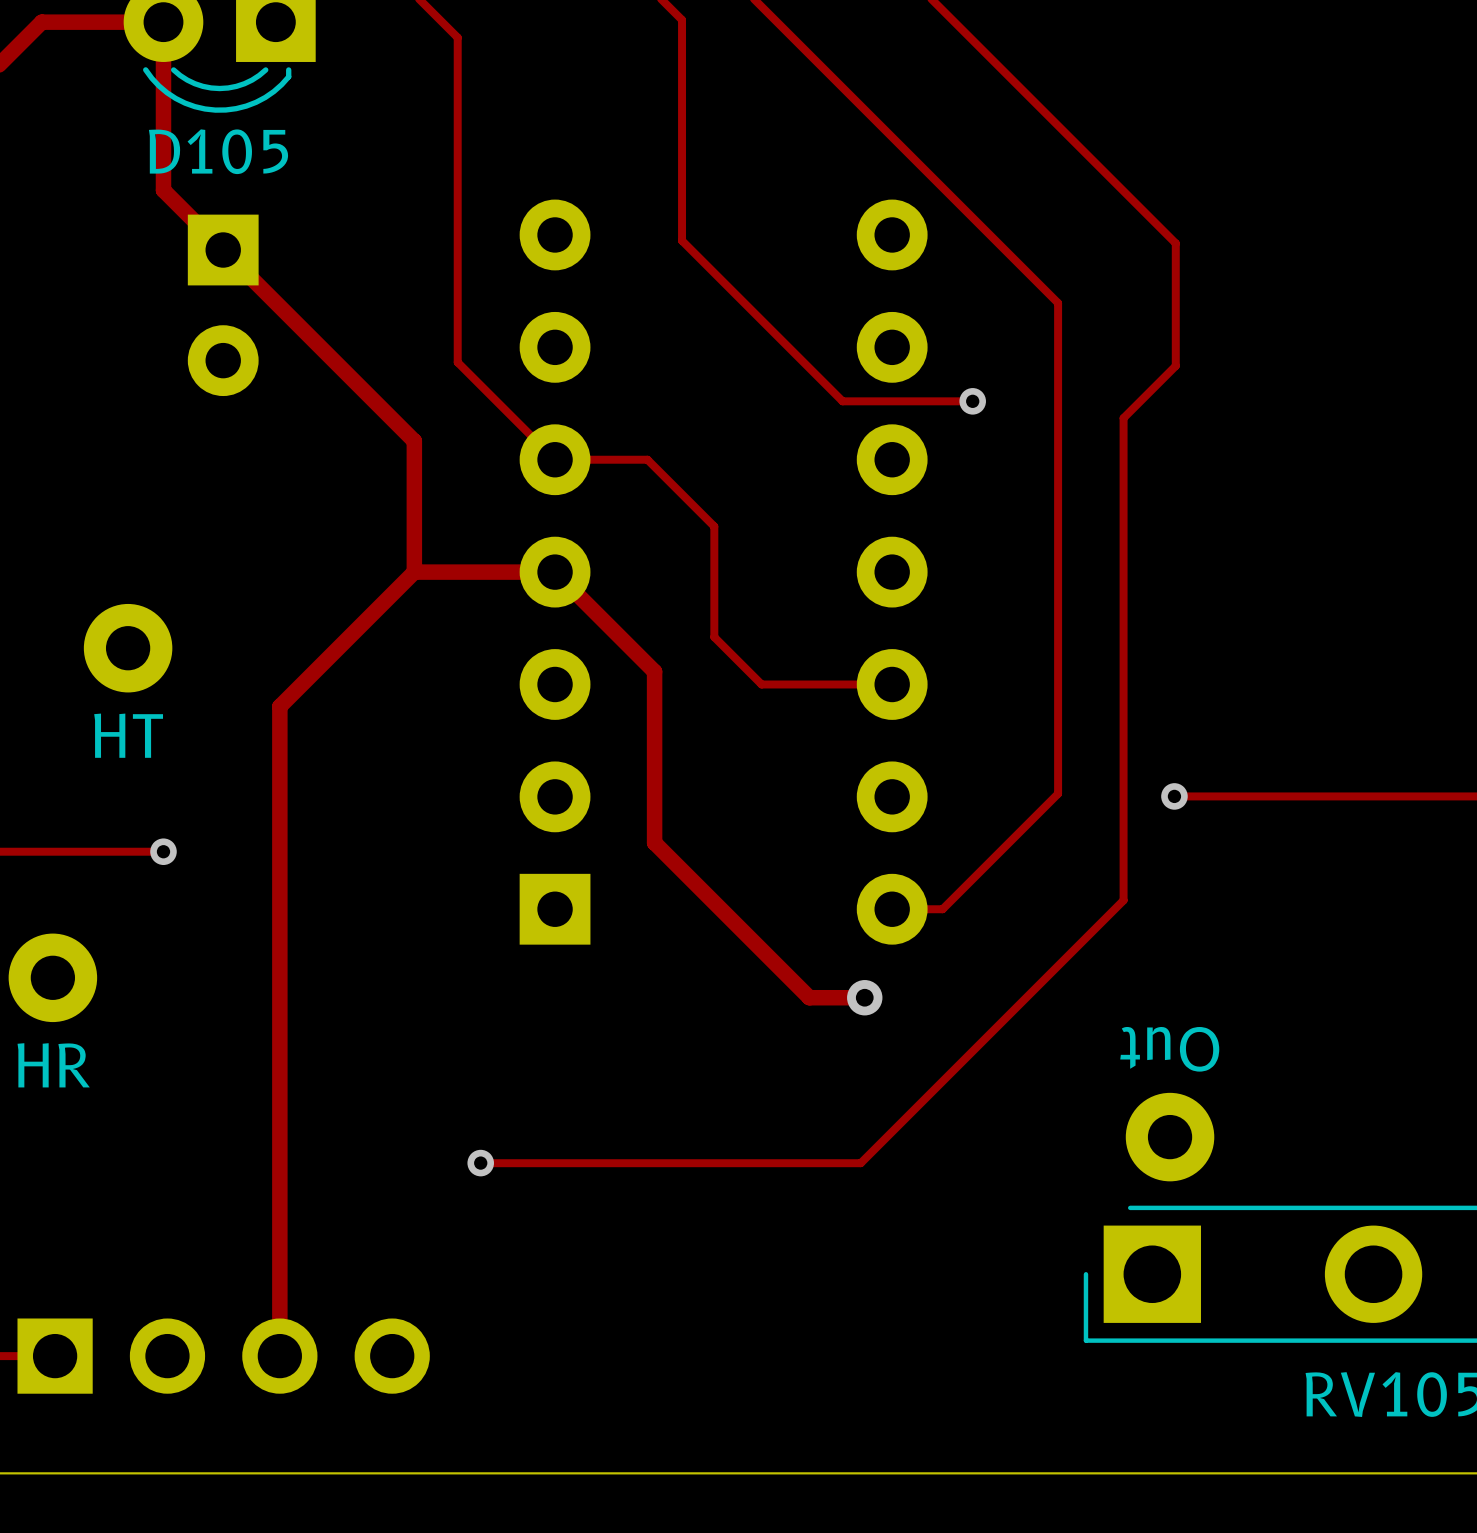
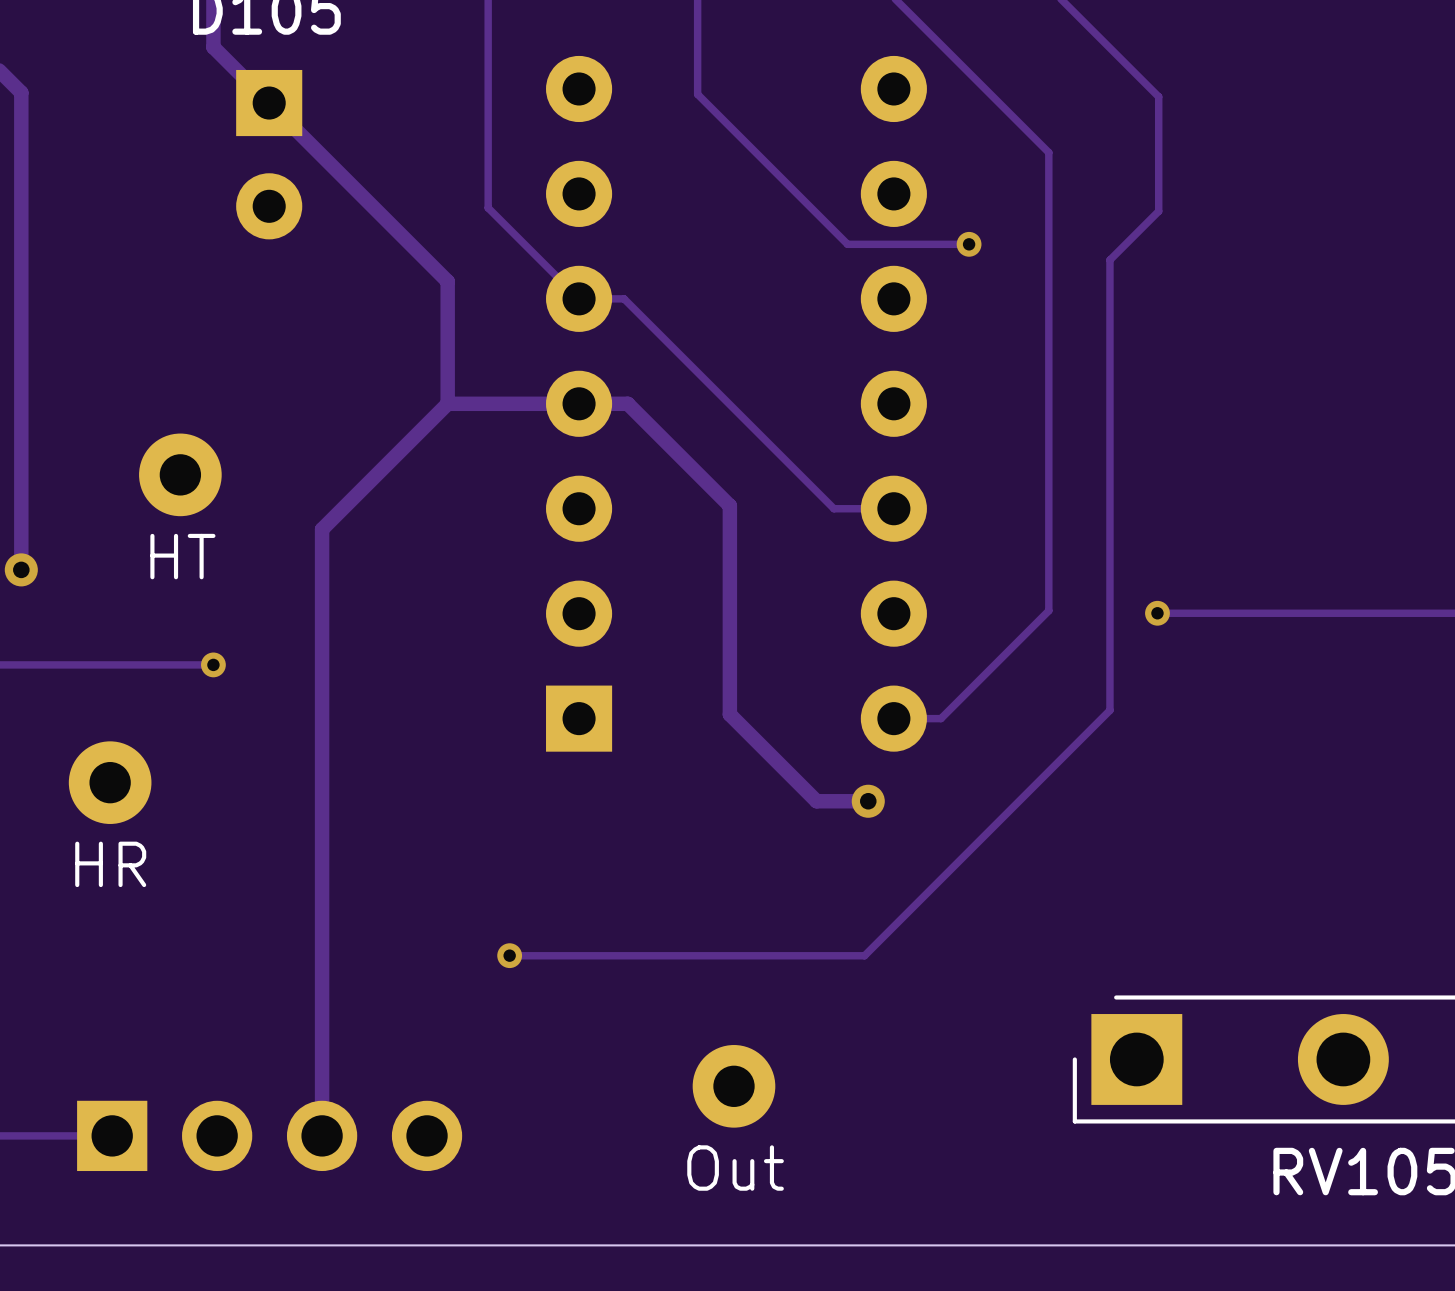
track: (603, 459) (647, 459) (714, 526) (714, 637) (761, 684) (828, 684) -> (624, 298) (833, 508)
track: (555, 572) (654, 671) (654, 842) (716, 904) -> (579, 403) (627, 403) (729, 505) (729, 714)
part value rotation: 0° (1169, 1049) -> 180° (735, 1168)
part value position: Out (1169, 1049) -> Out (735, 1168)
part position: (1170, 1137) -> (733, 1086)

